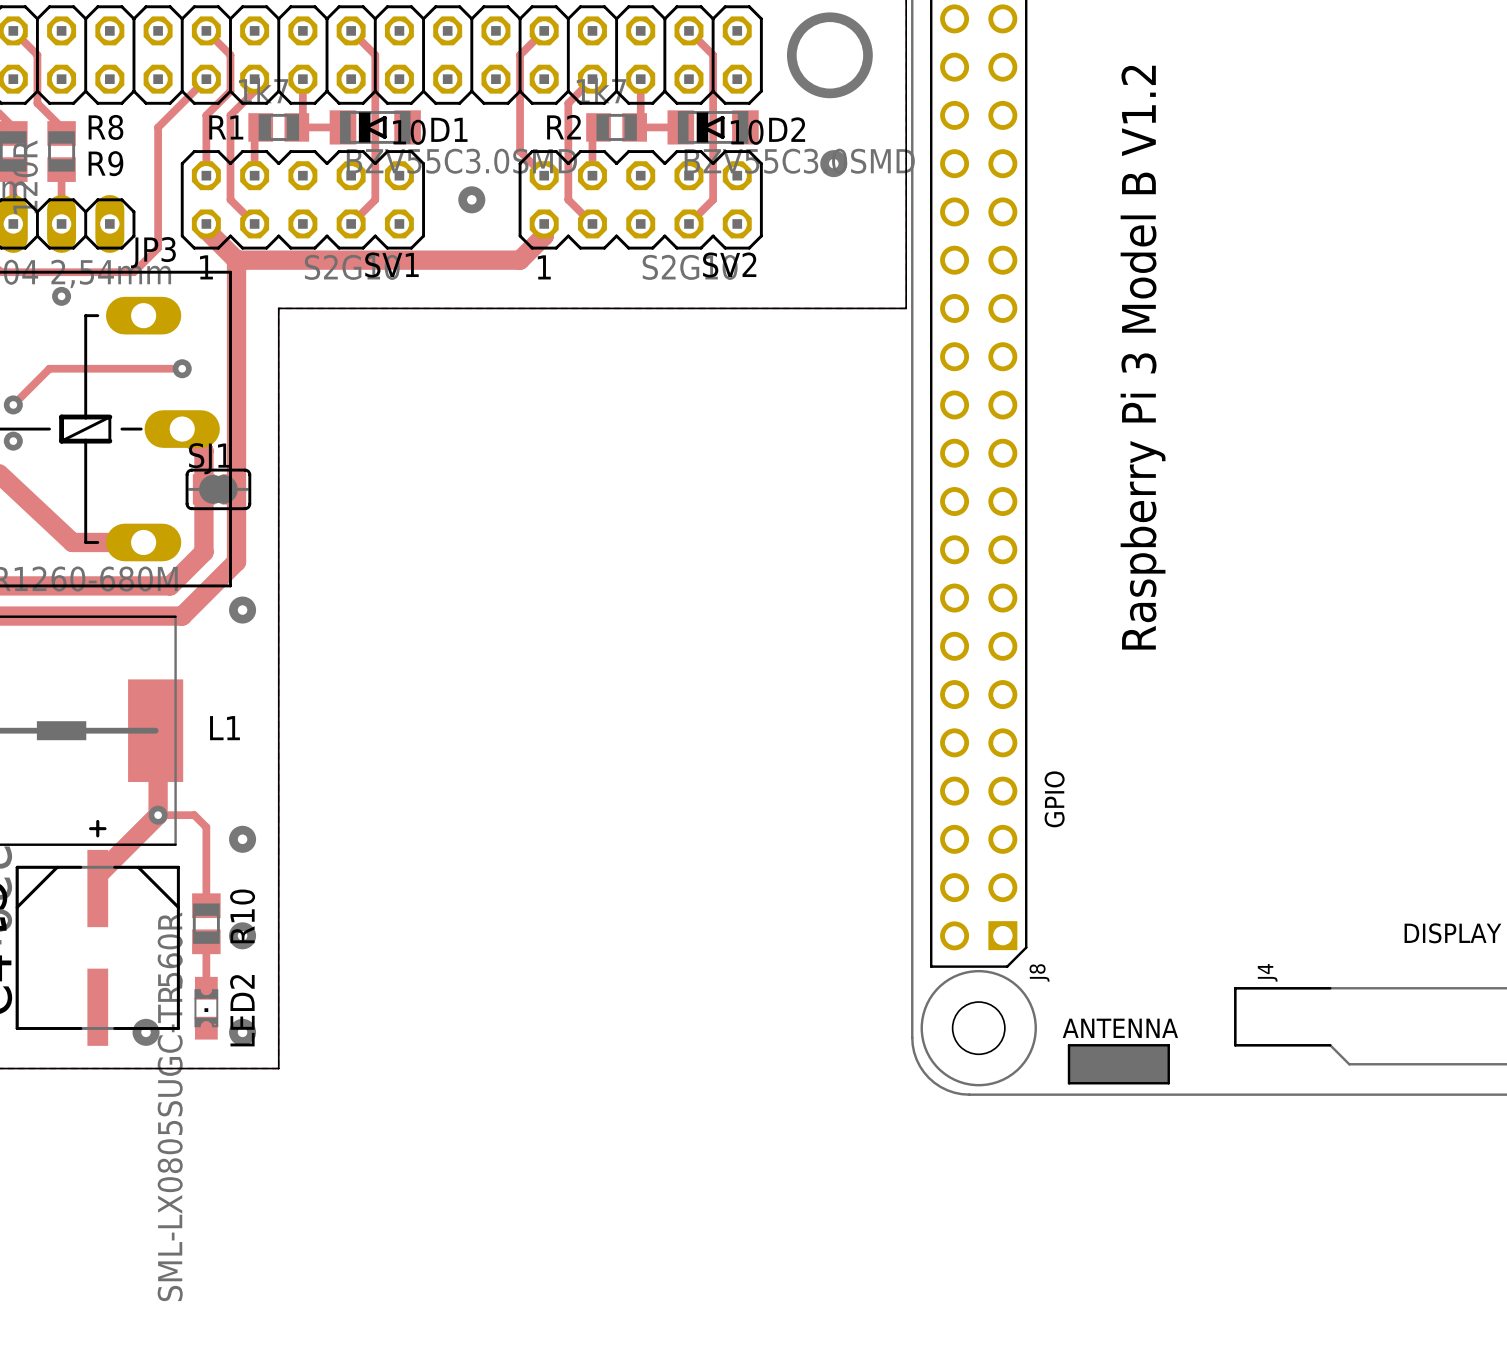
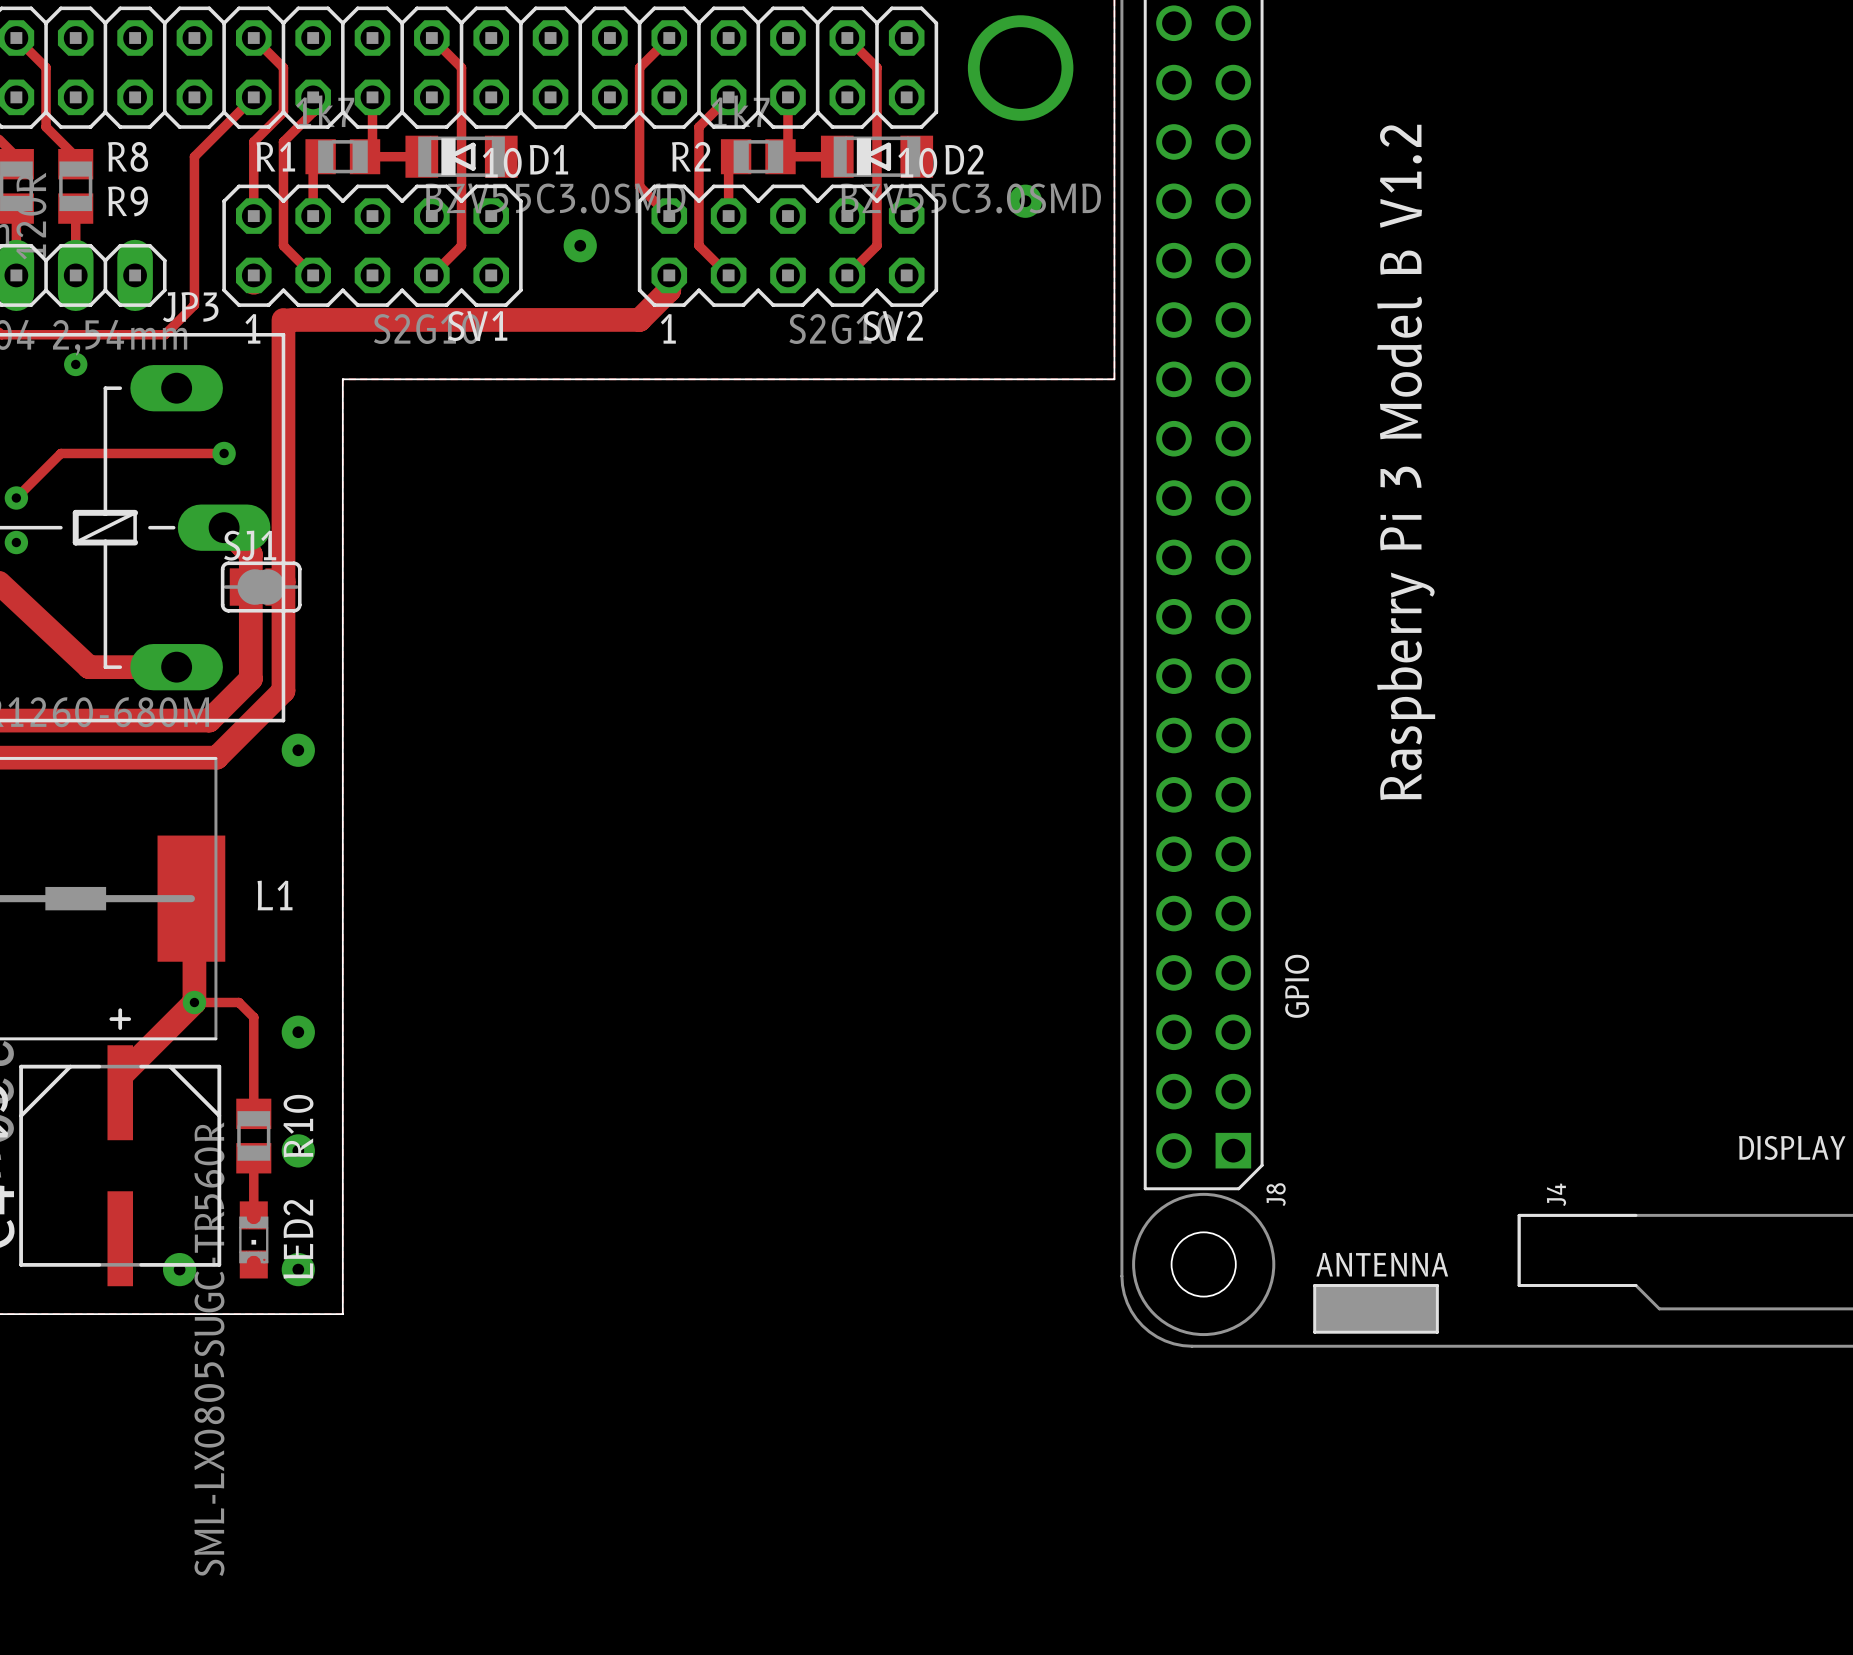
track: (206, 229) (236, 260) (236, 561) (182, 616) (176, 616) -> (283, 319) (283, 690) (216, 757)
SJ1 position: (218, 489) -> (261, 587)

